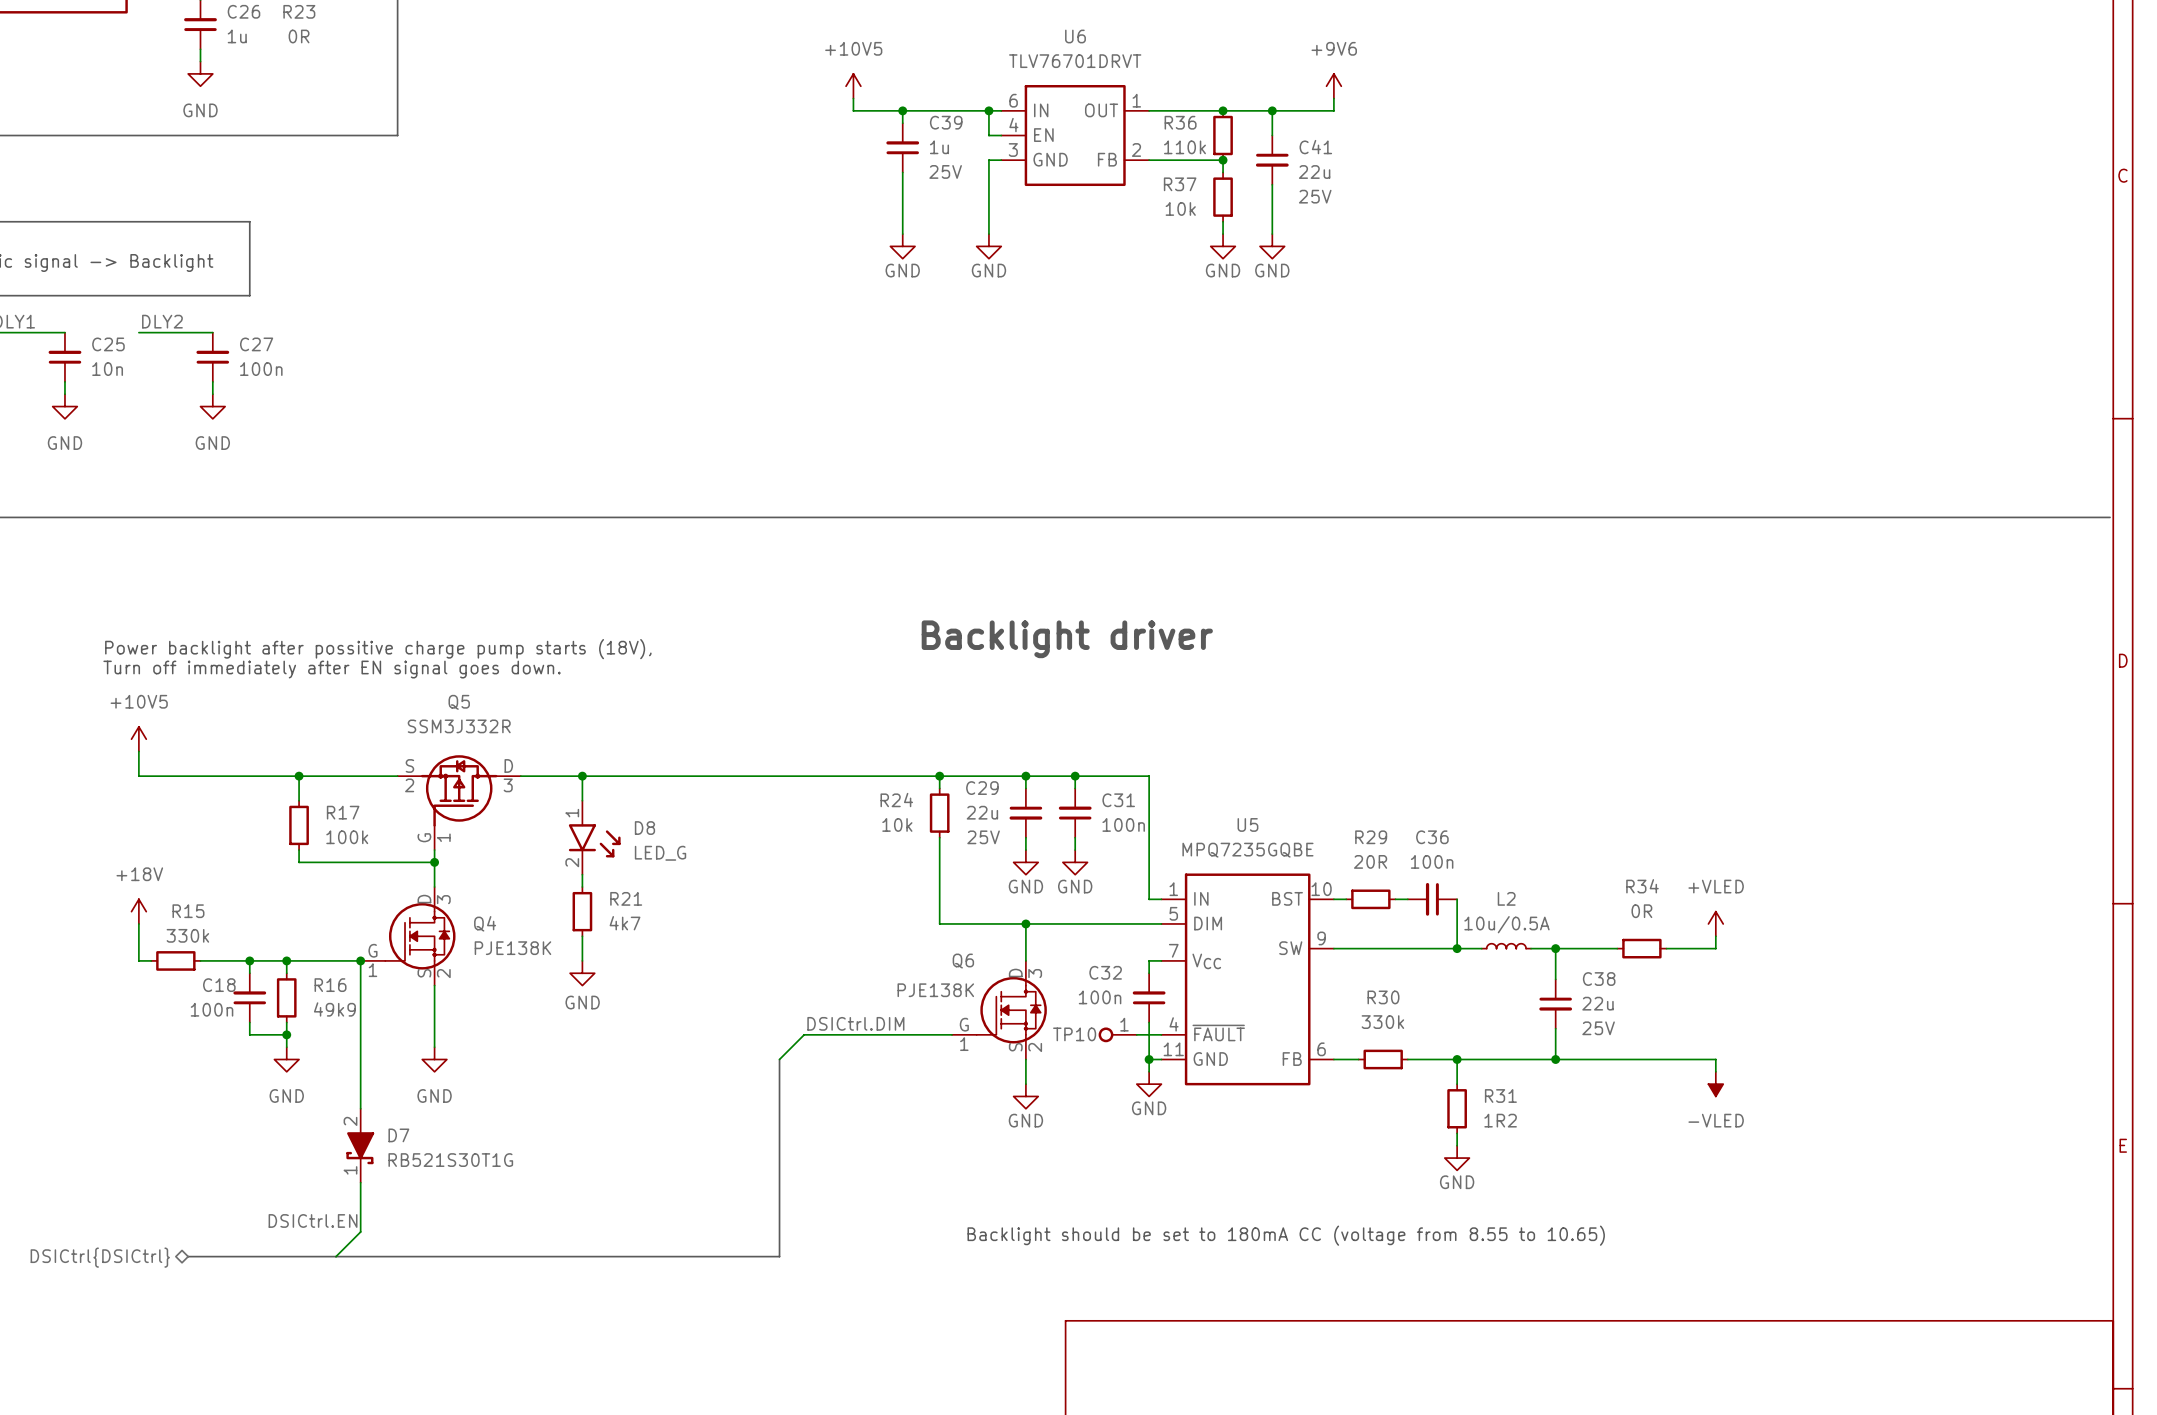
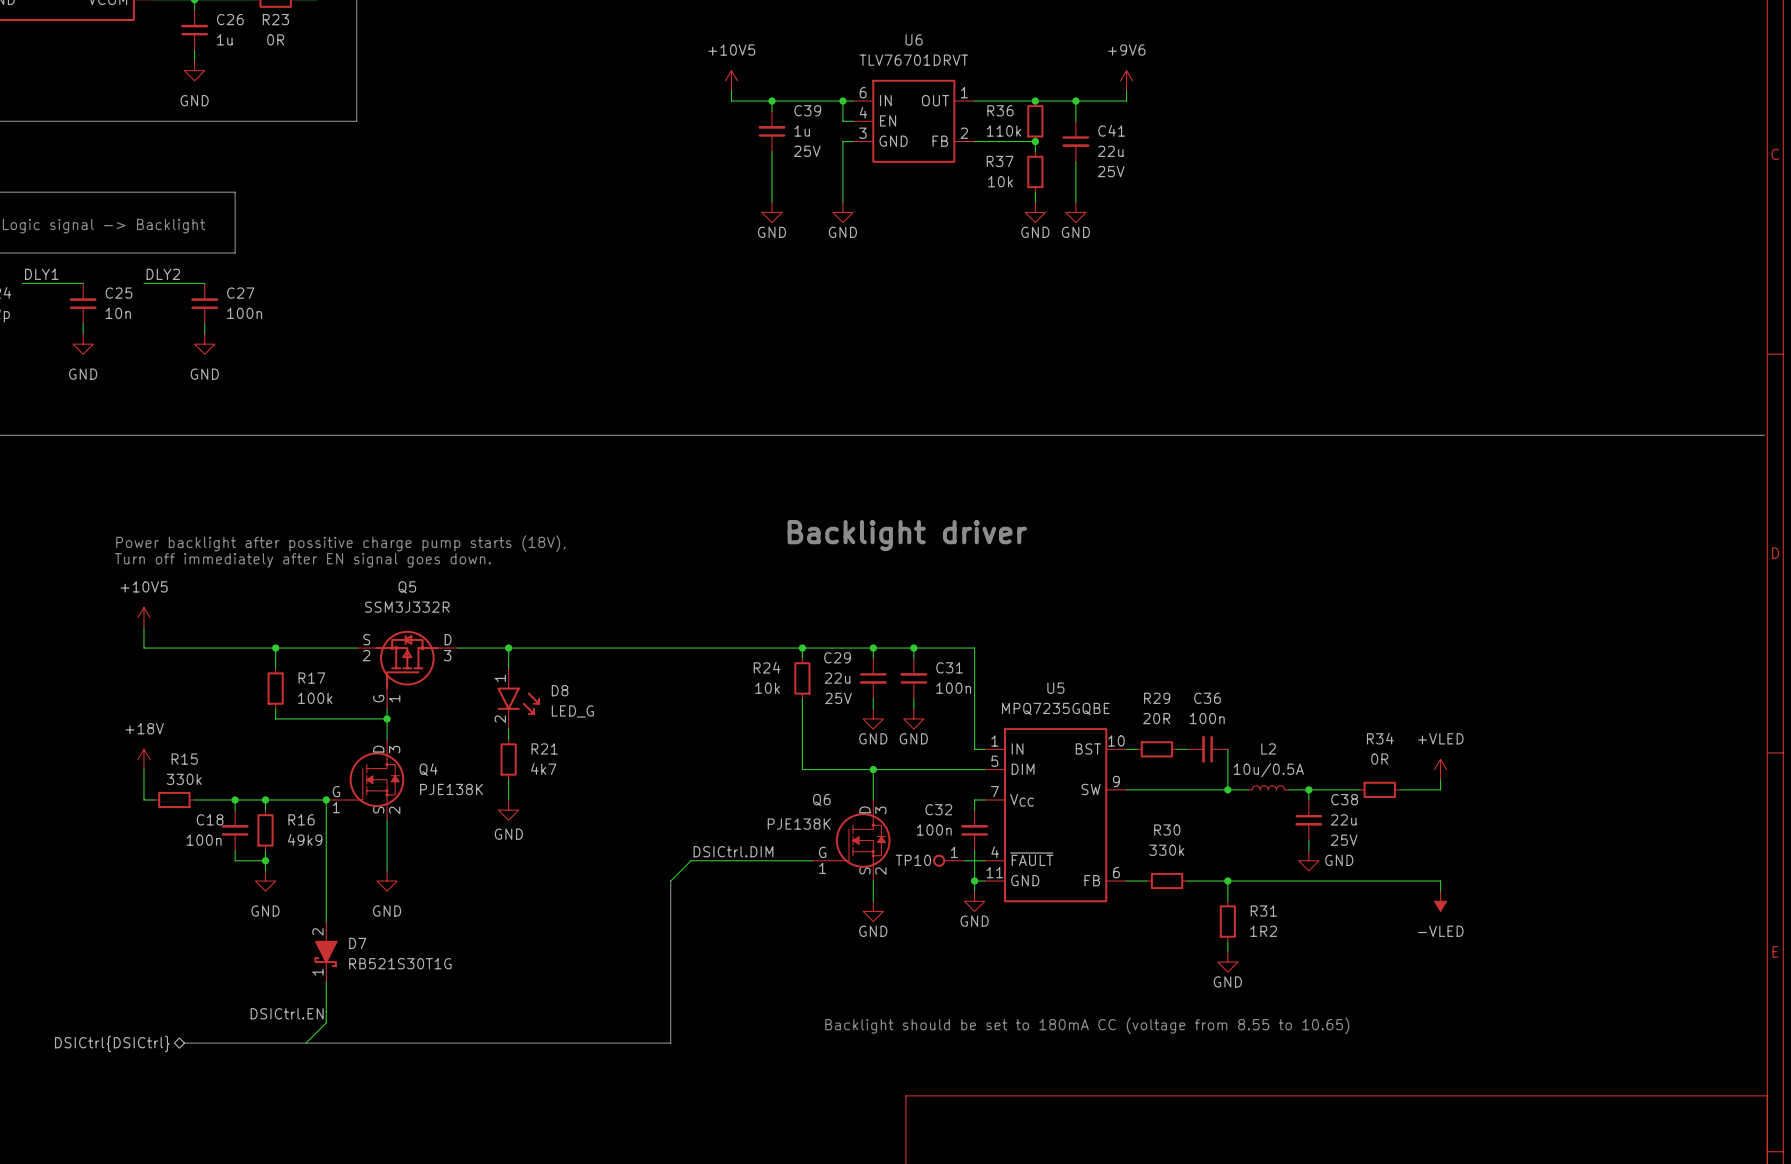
C38 position: (1555, 1004) -> (1308, 820)
wire: (1555, 1028) (1555, 1059) -> none
power symbol: none -> GND (1308, 860)
junction: (1555, 1059) -> none

